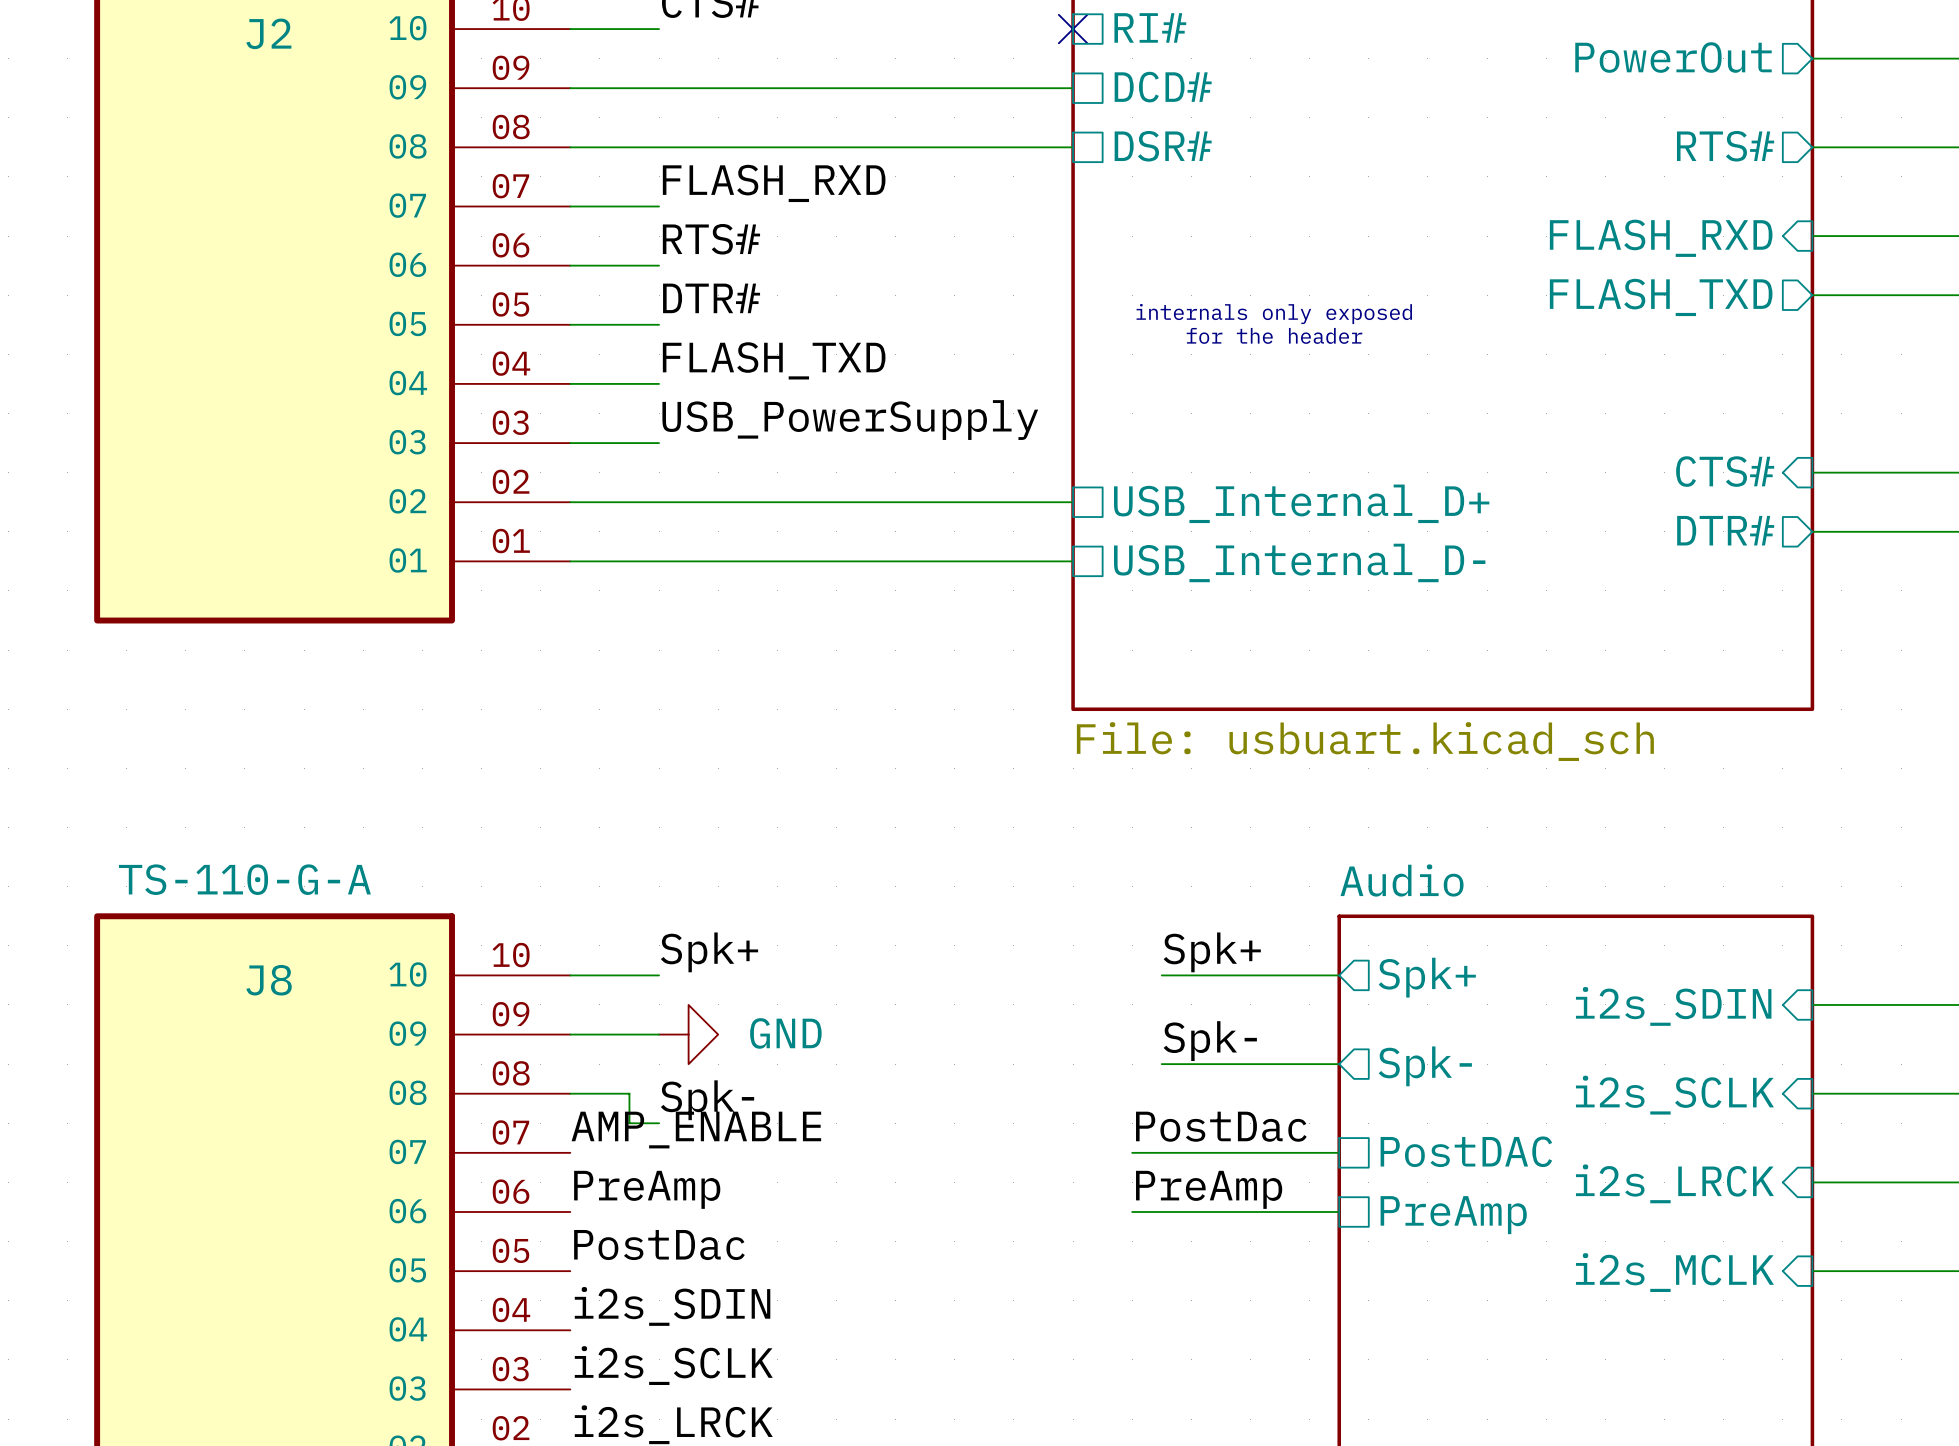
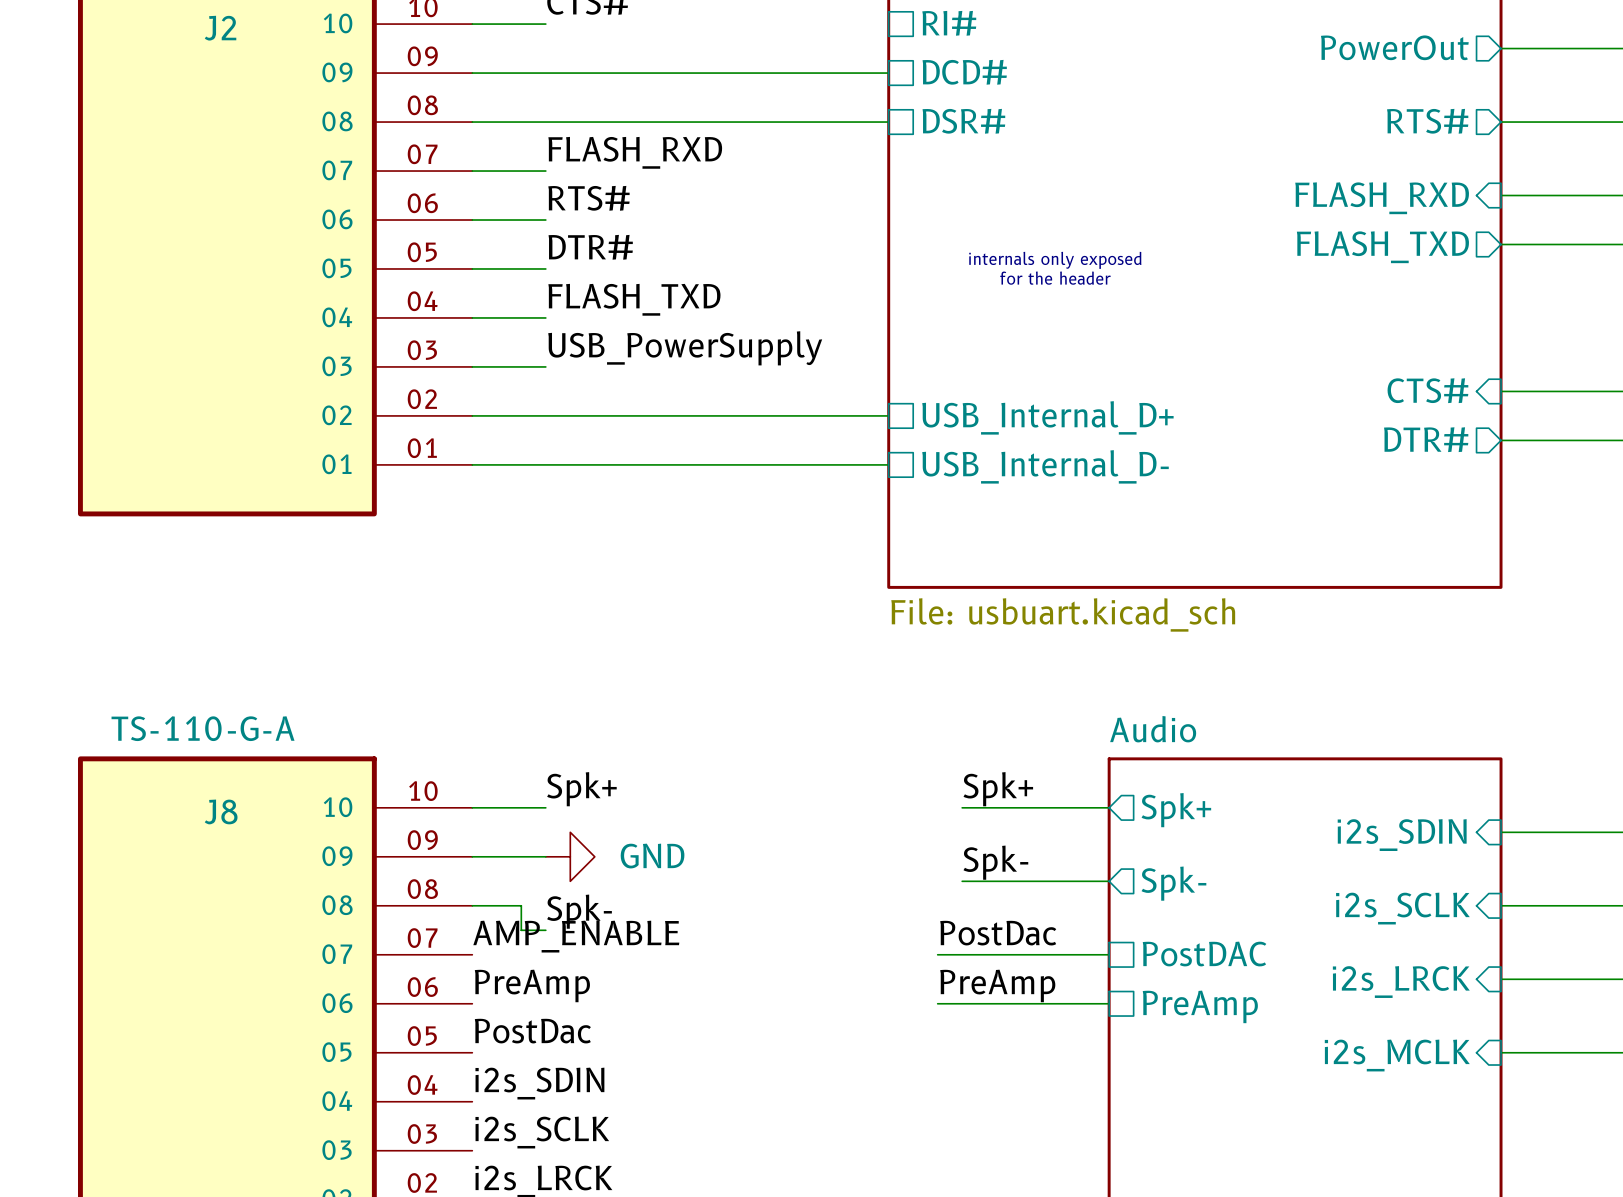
no-connect mark: (1073, 29) -> none

